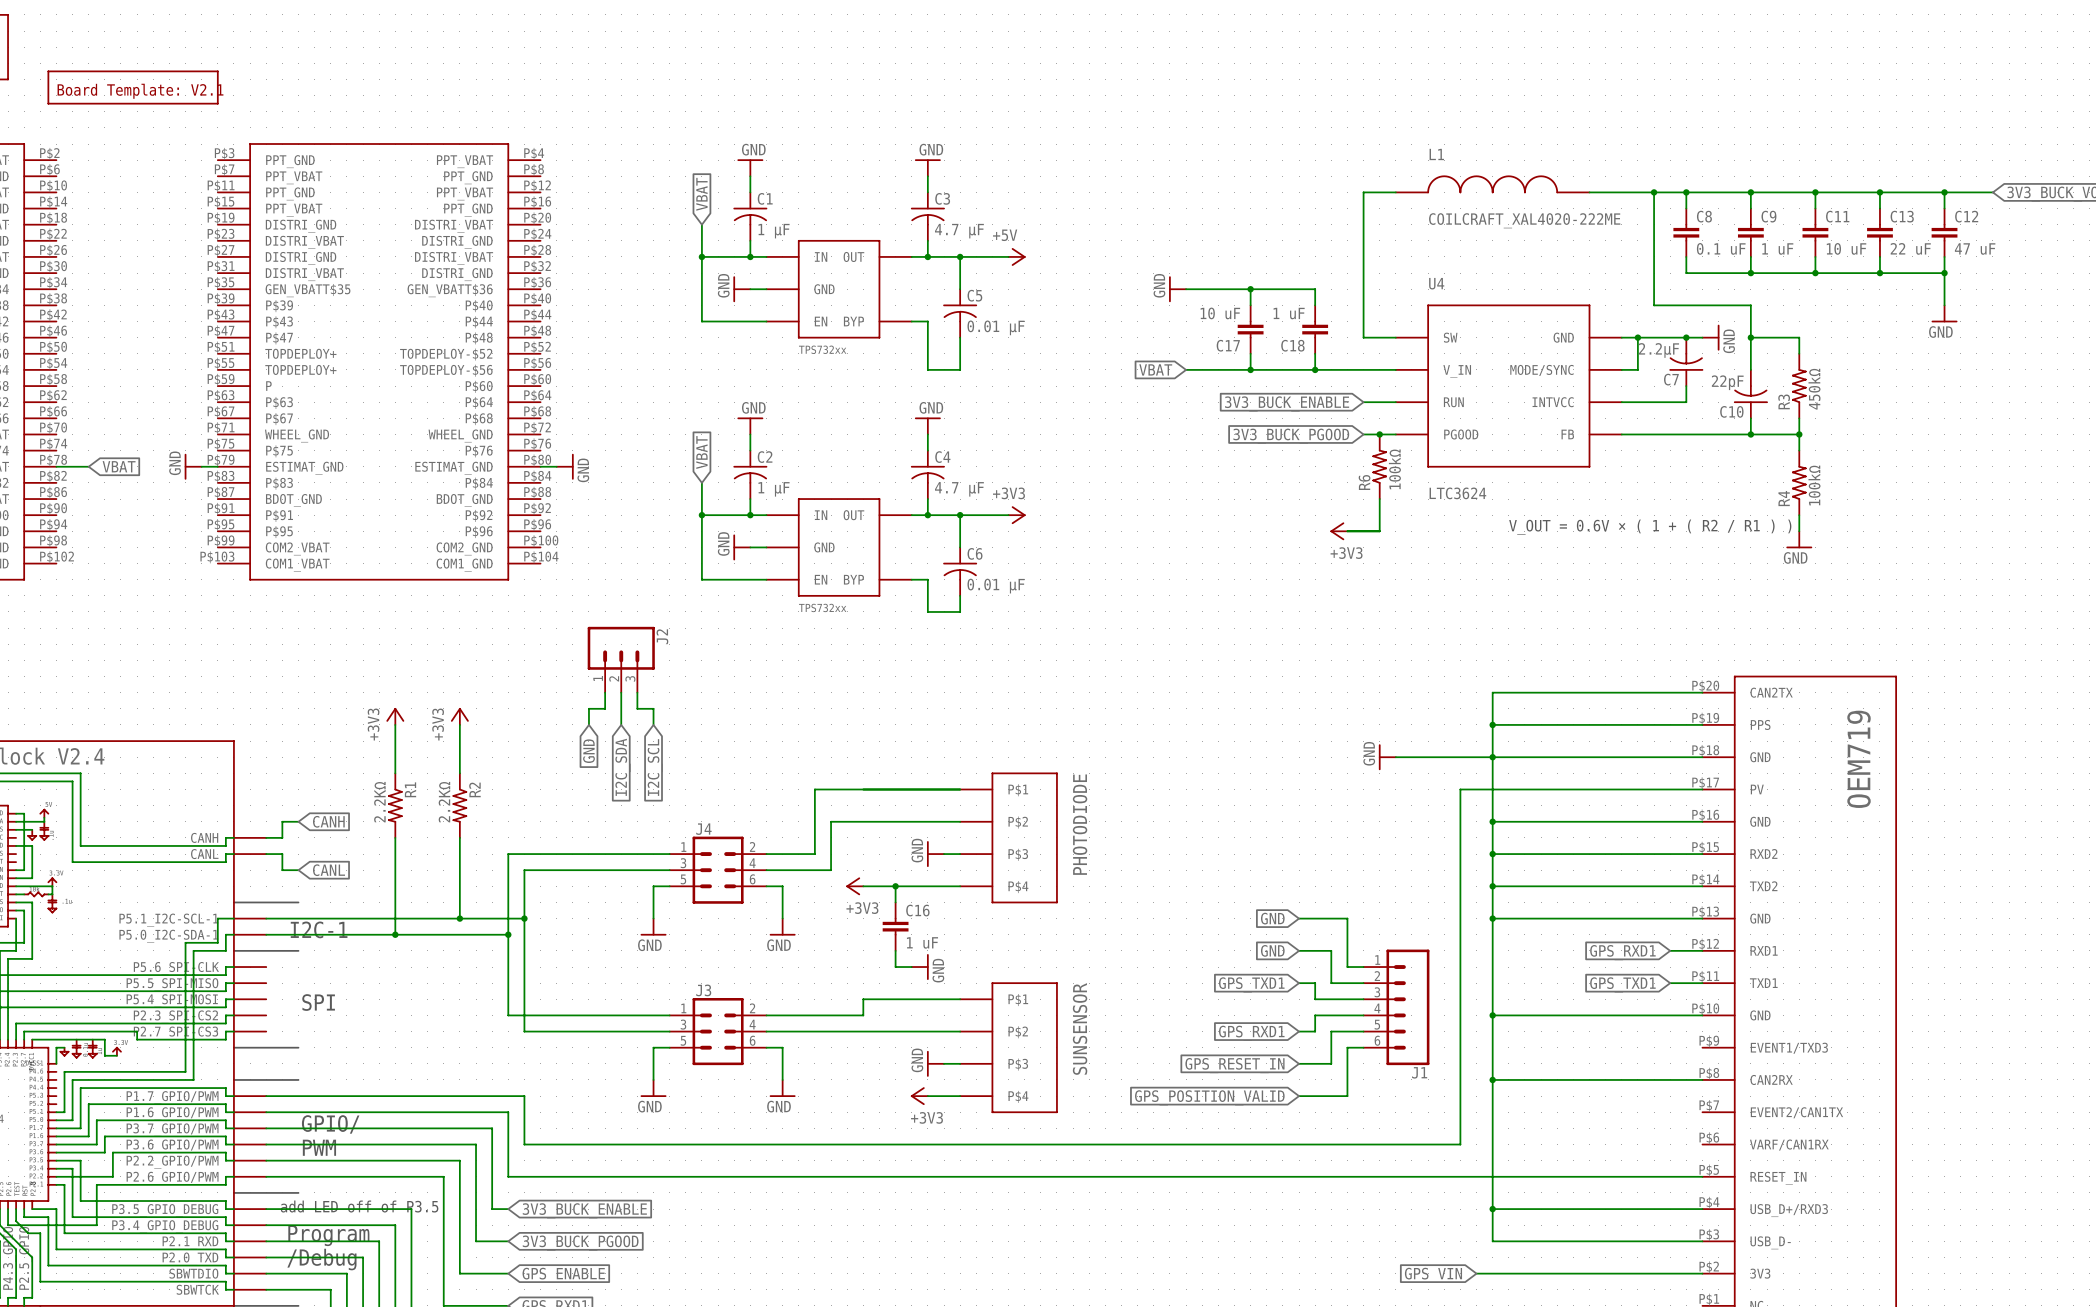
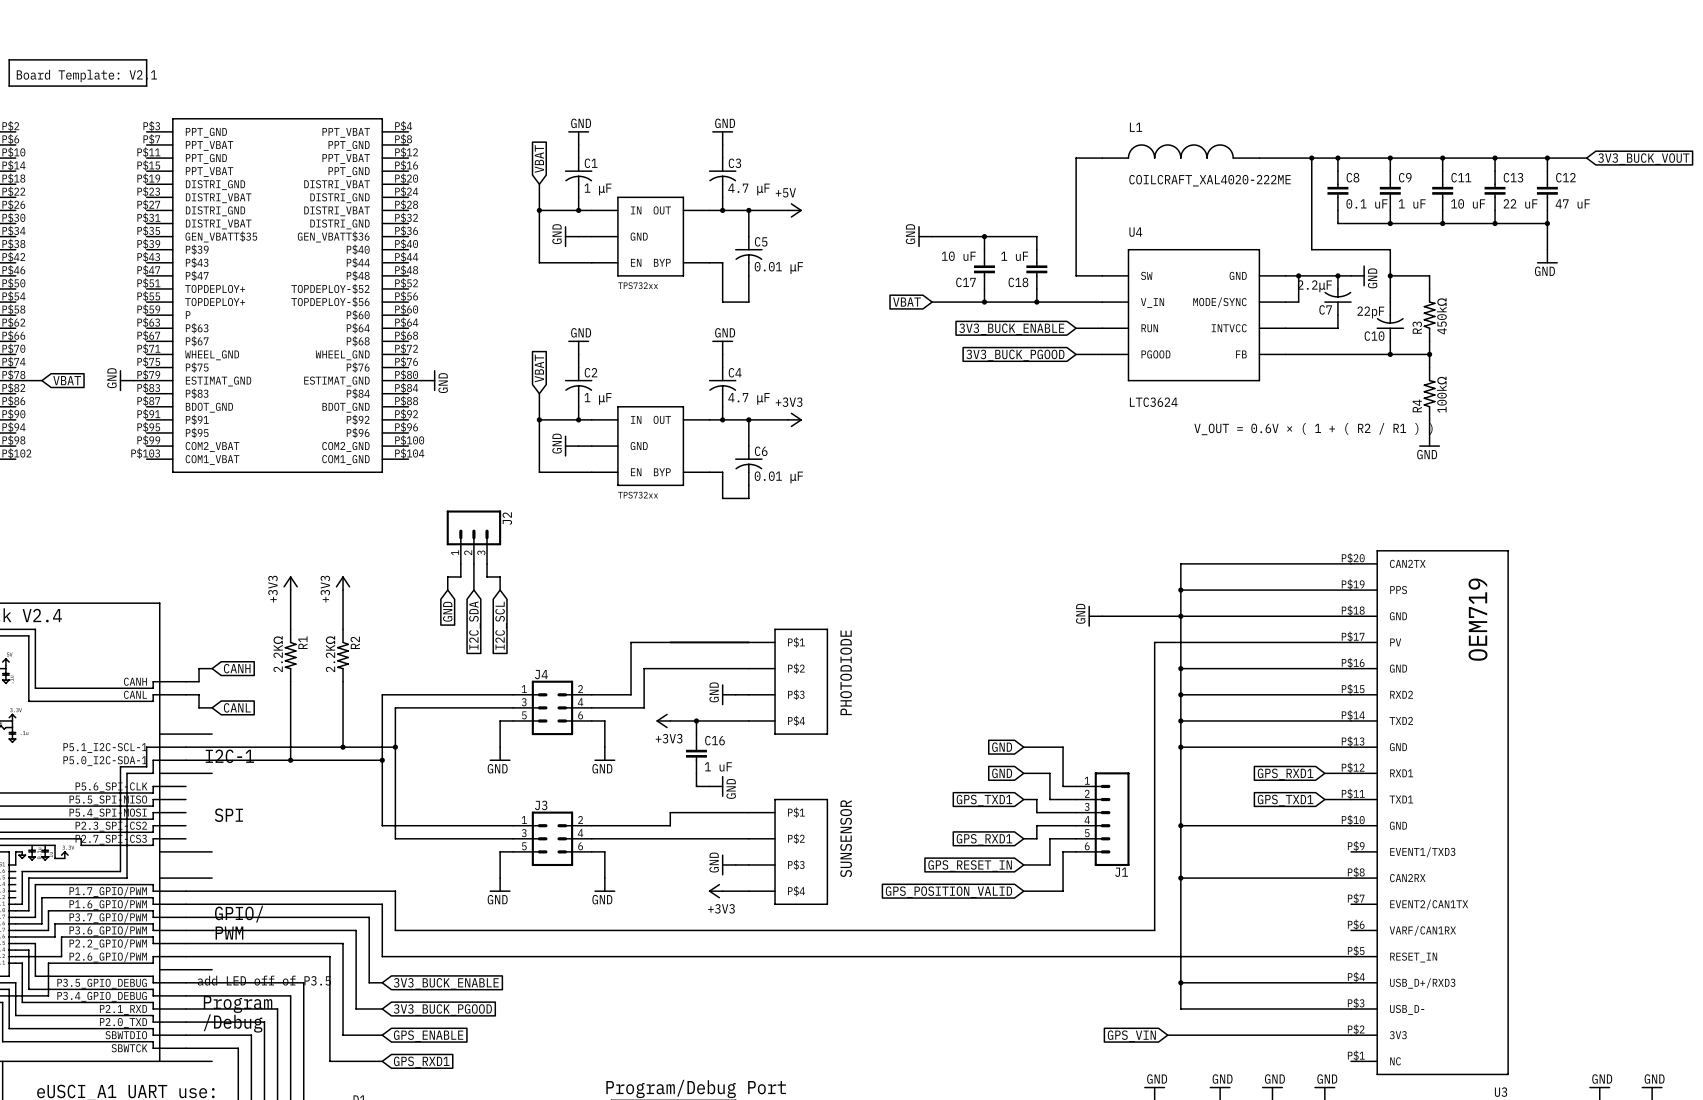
junction: (1379, 434) -> none
R6: 100kΩ (1379, 466) -> none
wire: (1379, 499) (1379, 531) (1347, 531) -> none
power symbol: +3V3 (1338, 531) -> none

